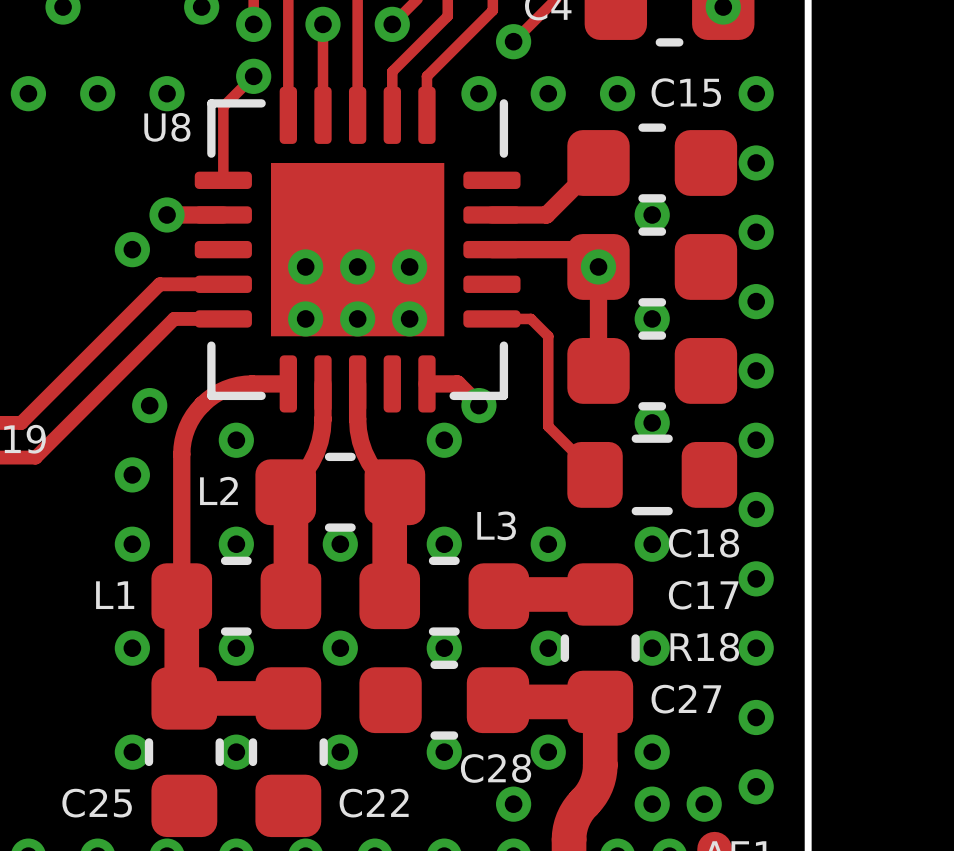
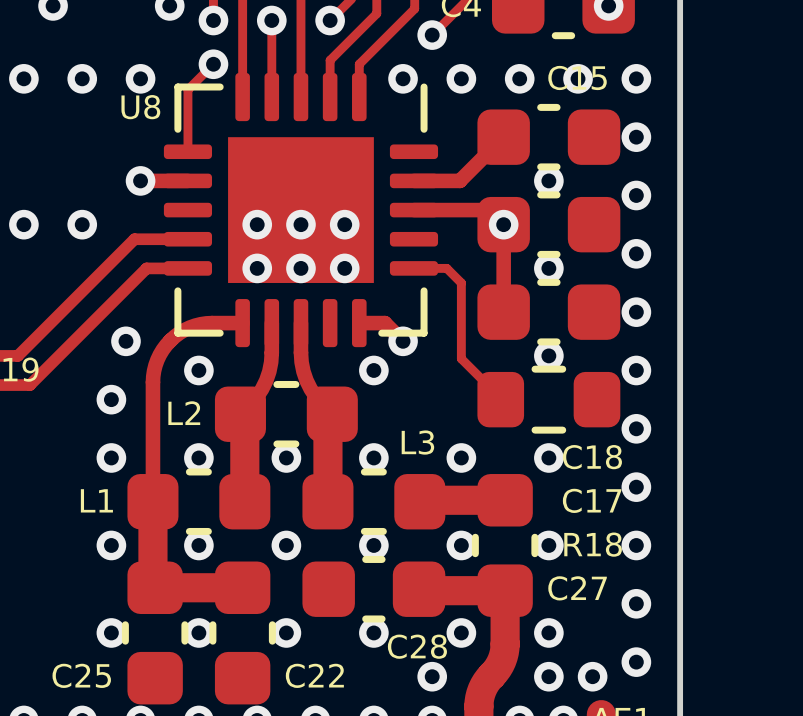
via: none -> (578, 78)
via position: (132, 249) -> (82, 224)
via: none -> (23, 224)

